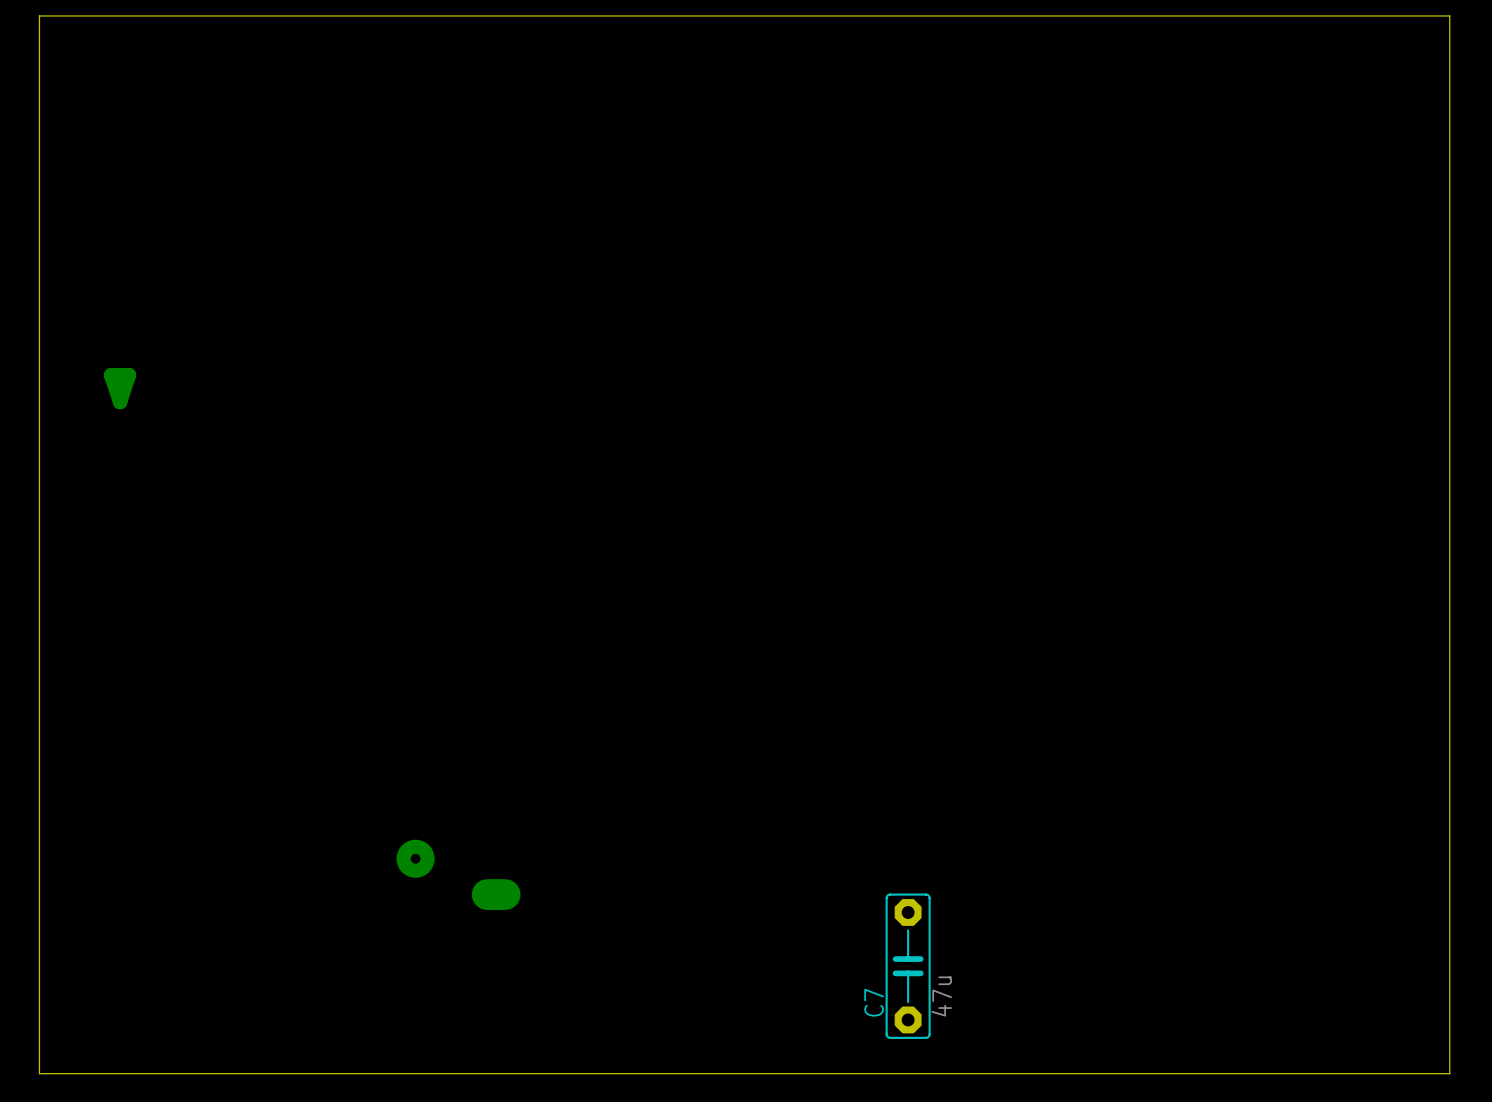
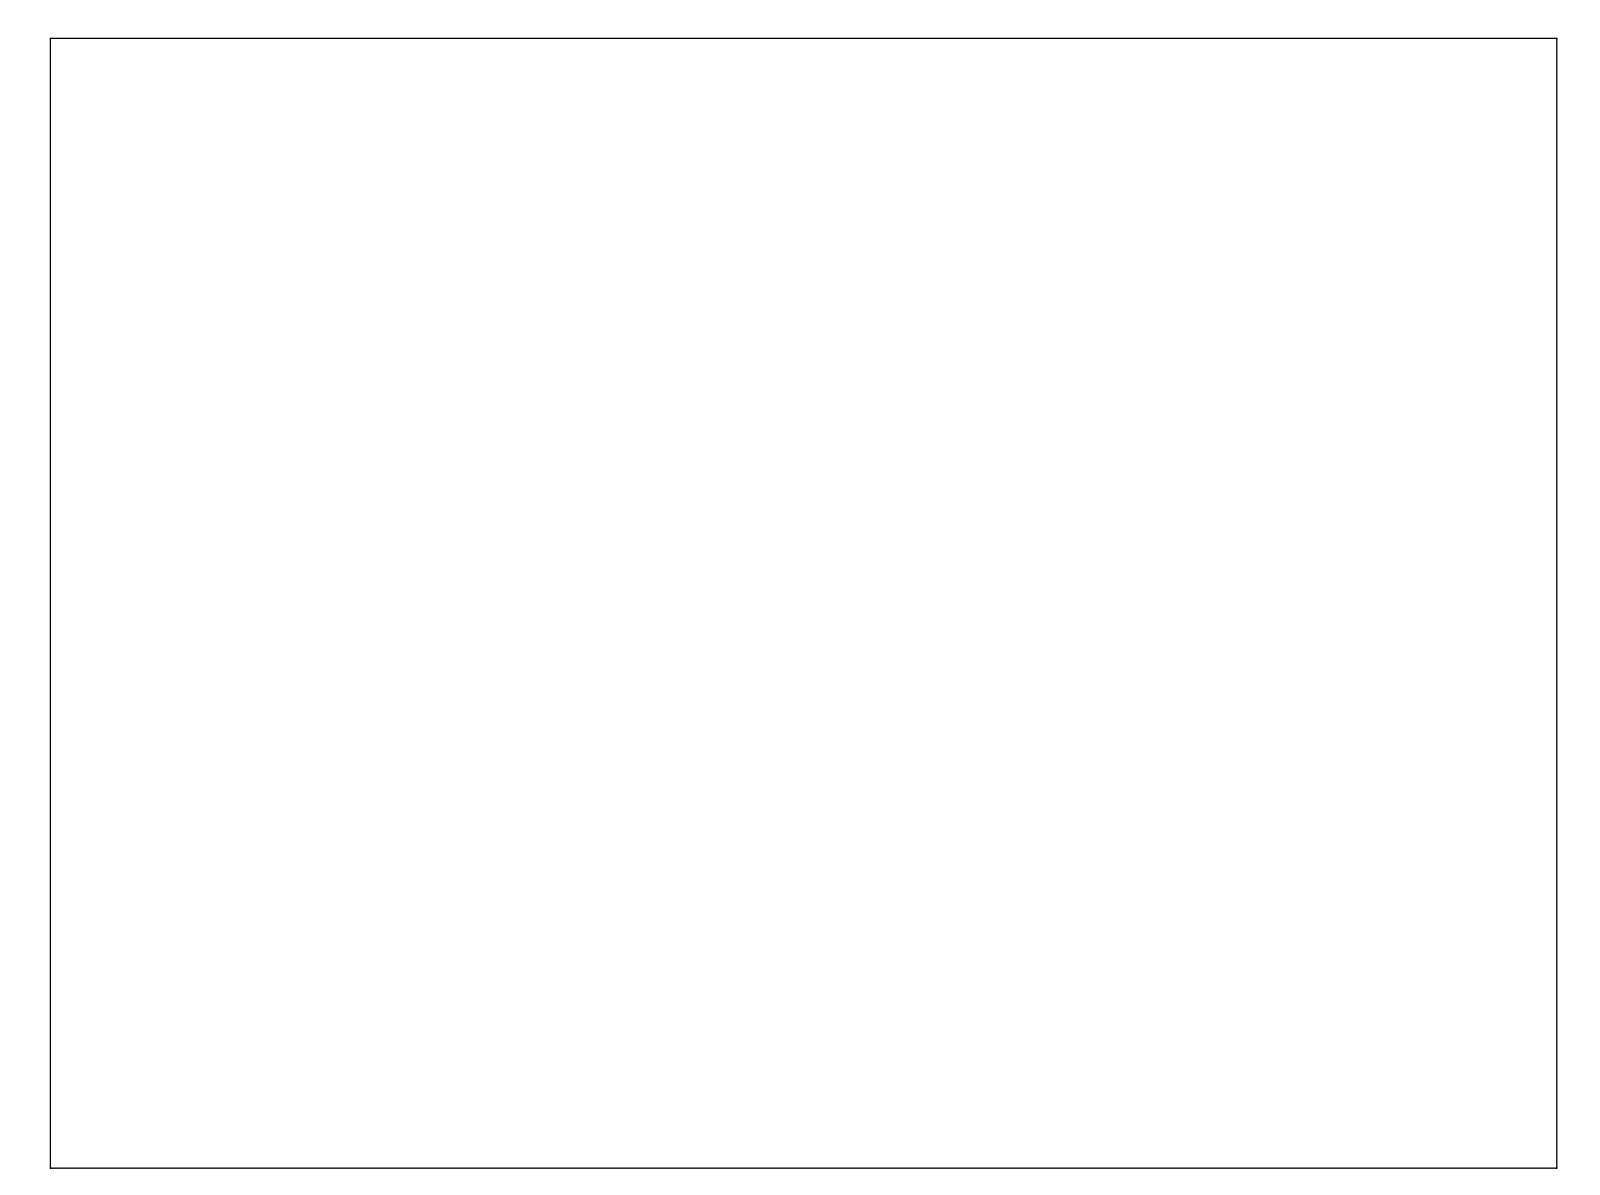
bottom track: (120, 402) (129, 375) (111, 375) (120, 402) -> none
drawing: [396, 839, 435, 878] -> none
bottom track: (487, 894) (505, 894) -> none
C7: 47u (908, 966) -> none

